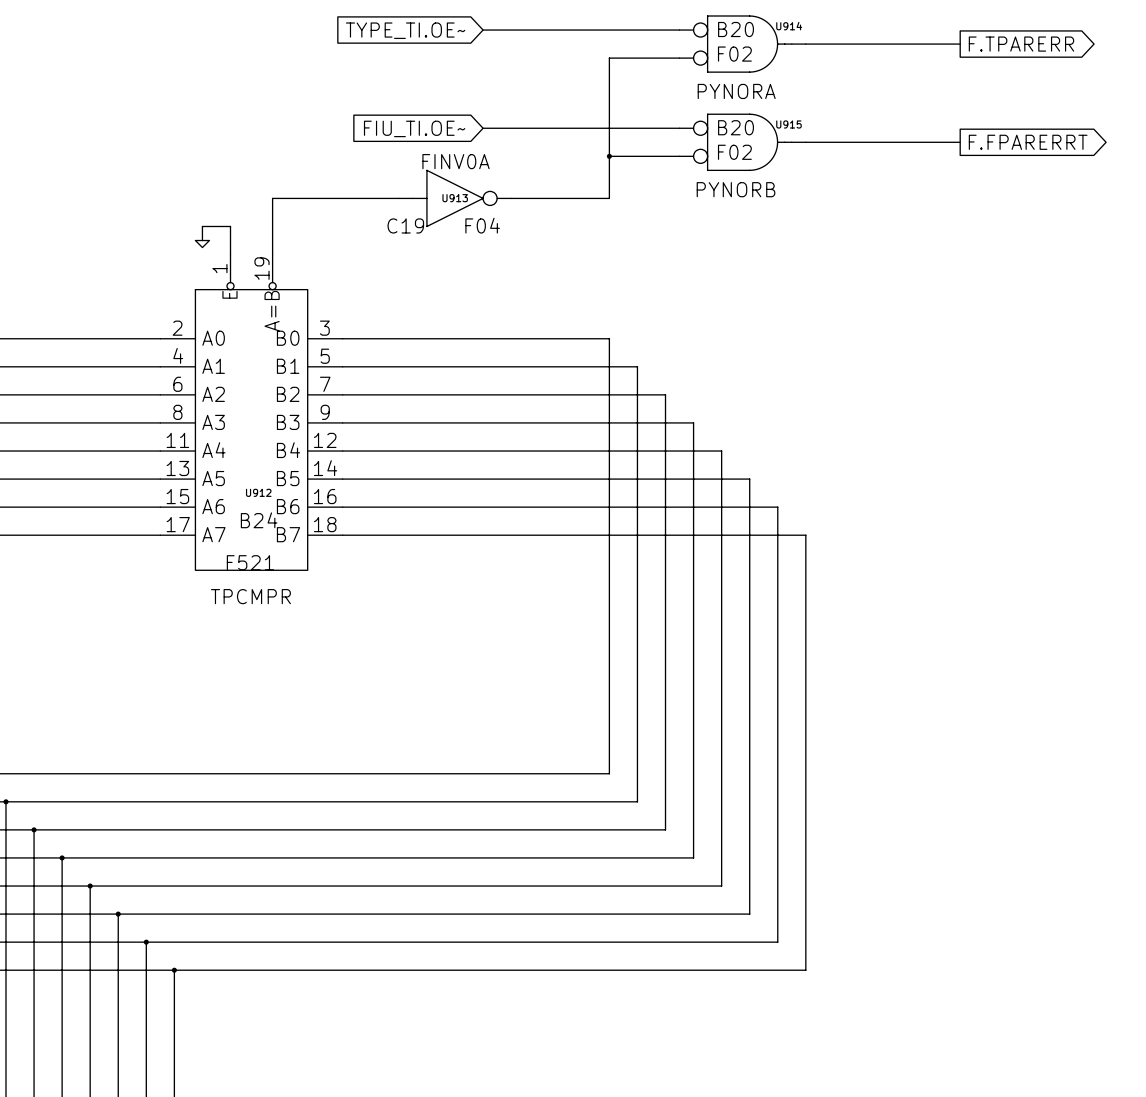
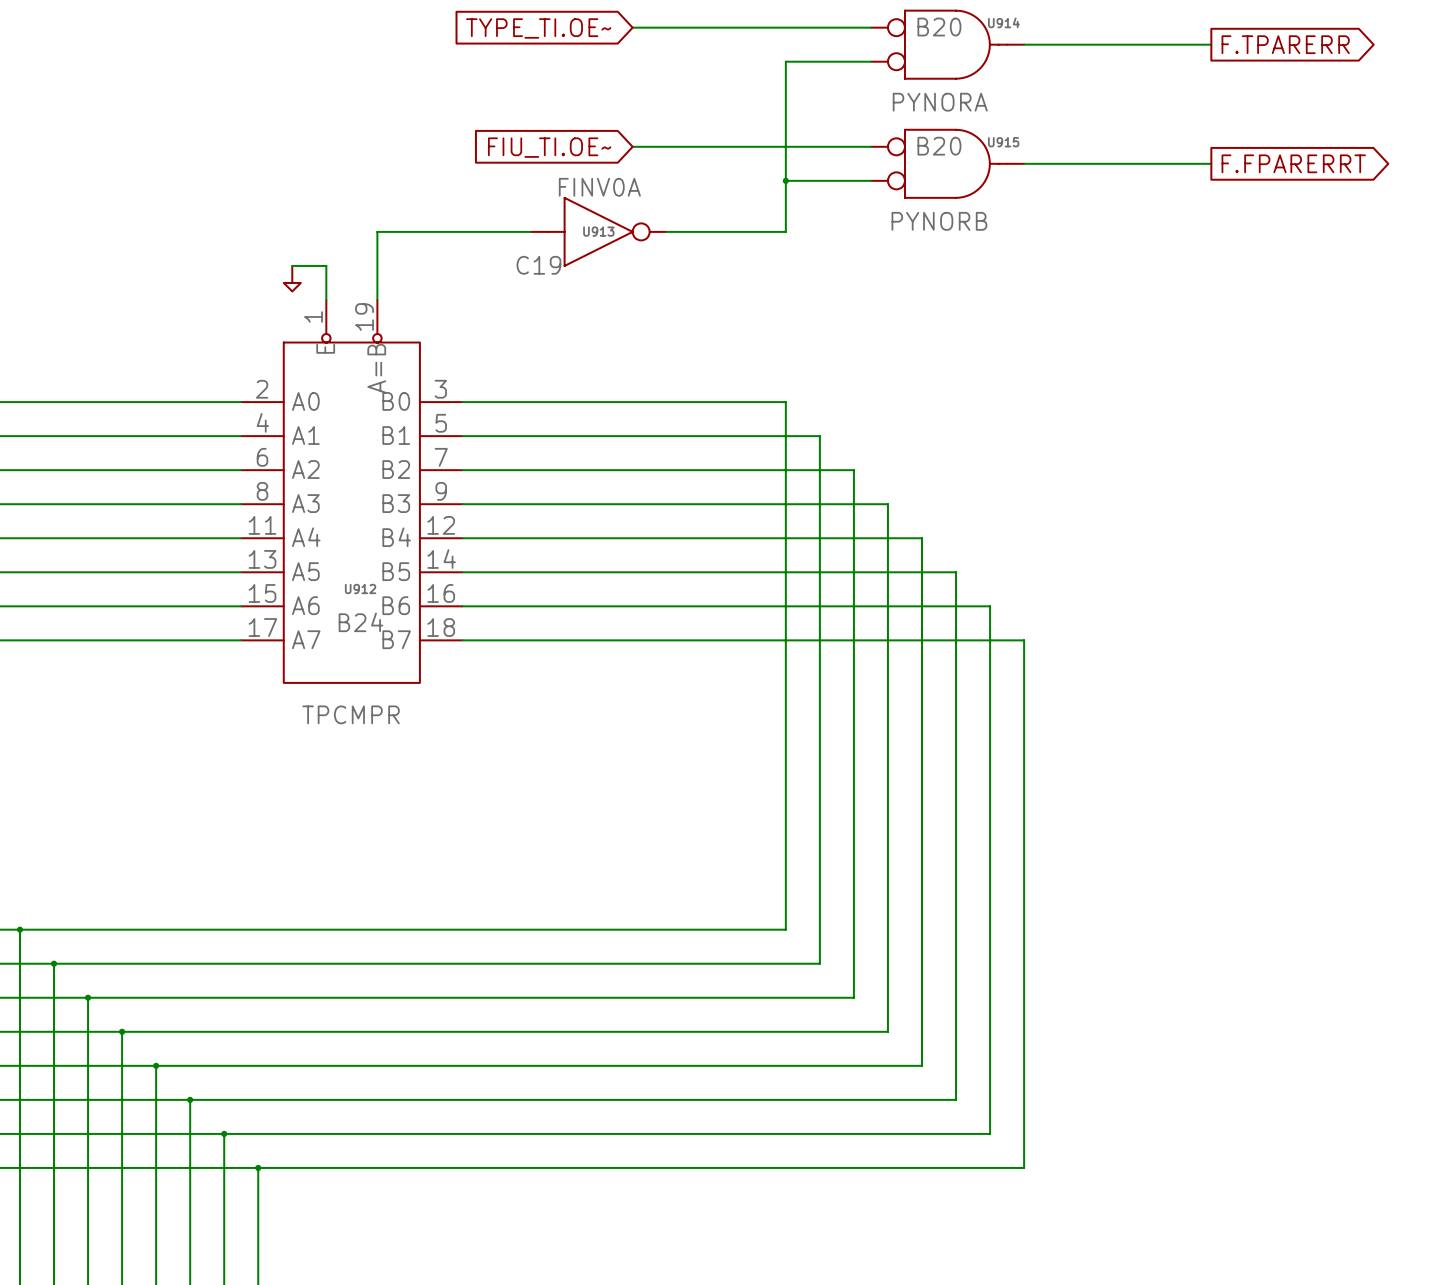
U914 value: F02 (734, 54) -> none
U915 value: F02 (734, 152) -> none
U913 value: F04 (482, 225) -> none
U912 value: F521 (250, 562) -> none

